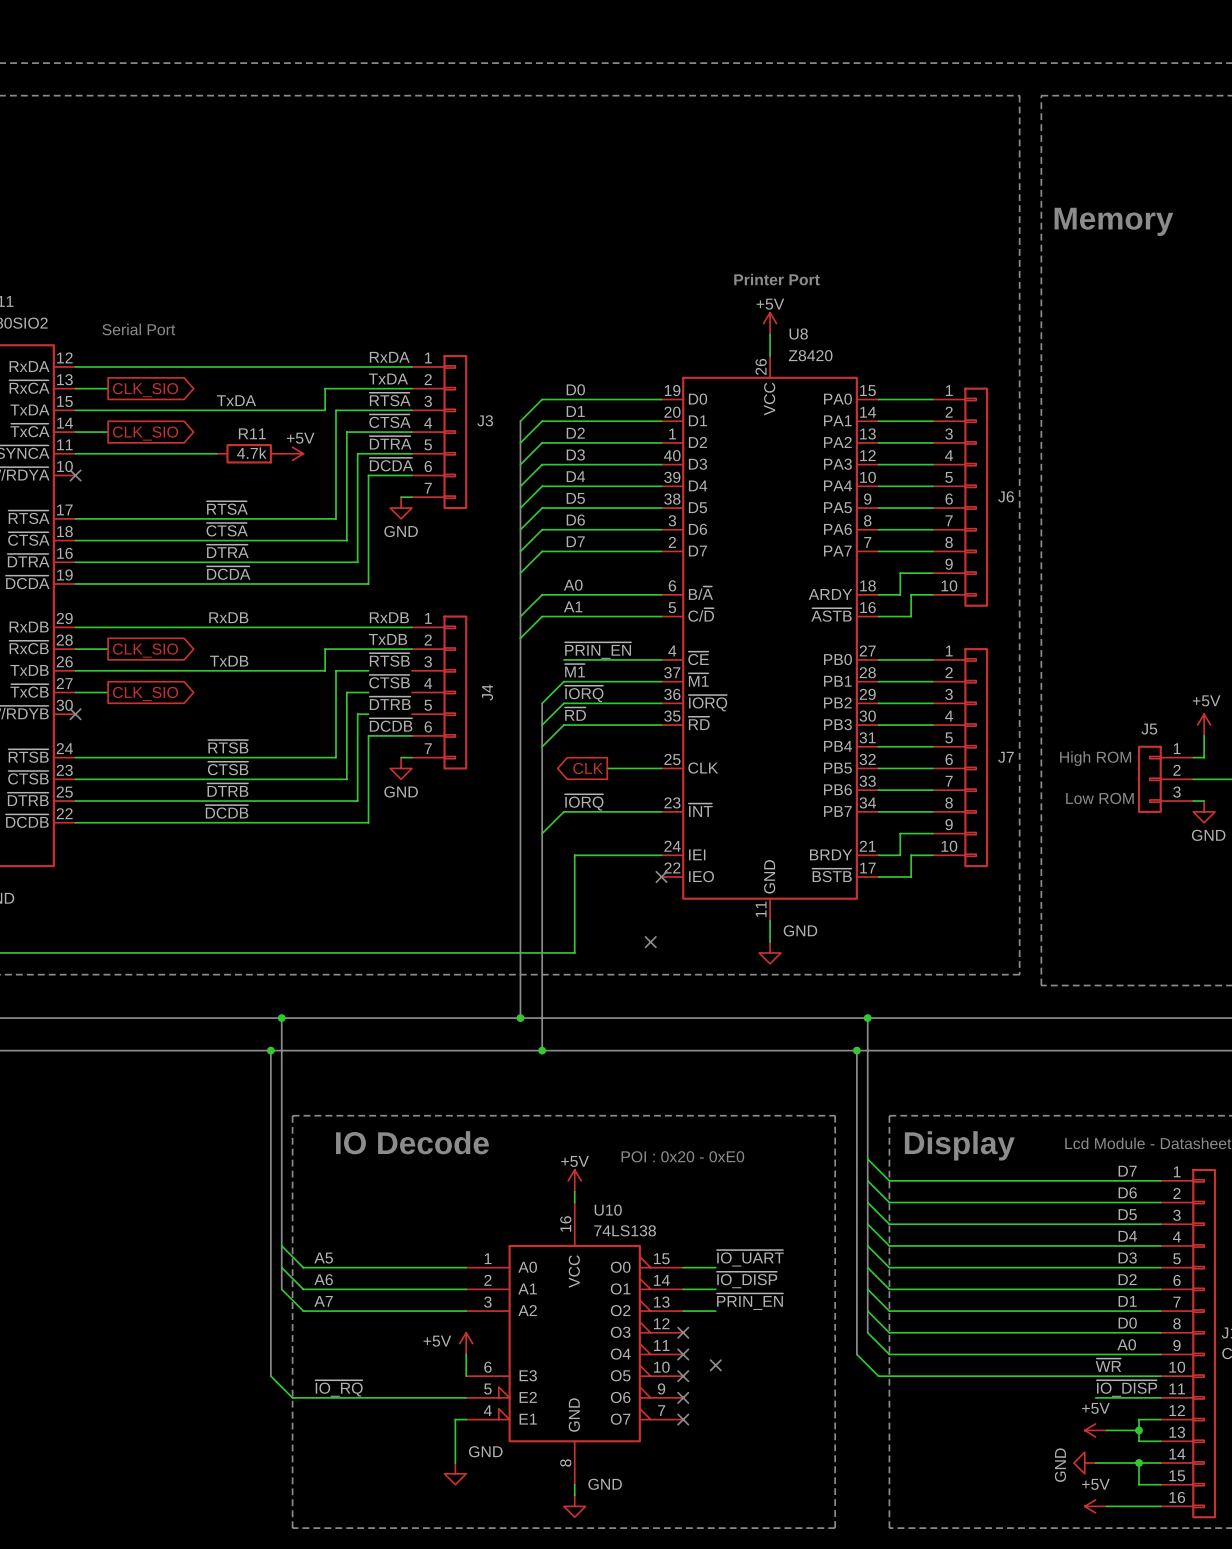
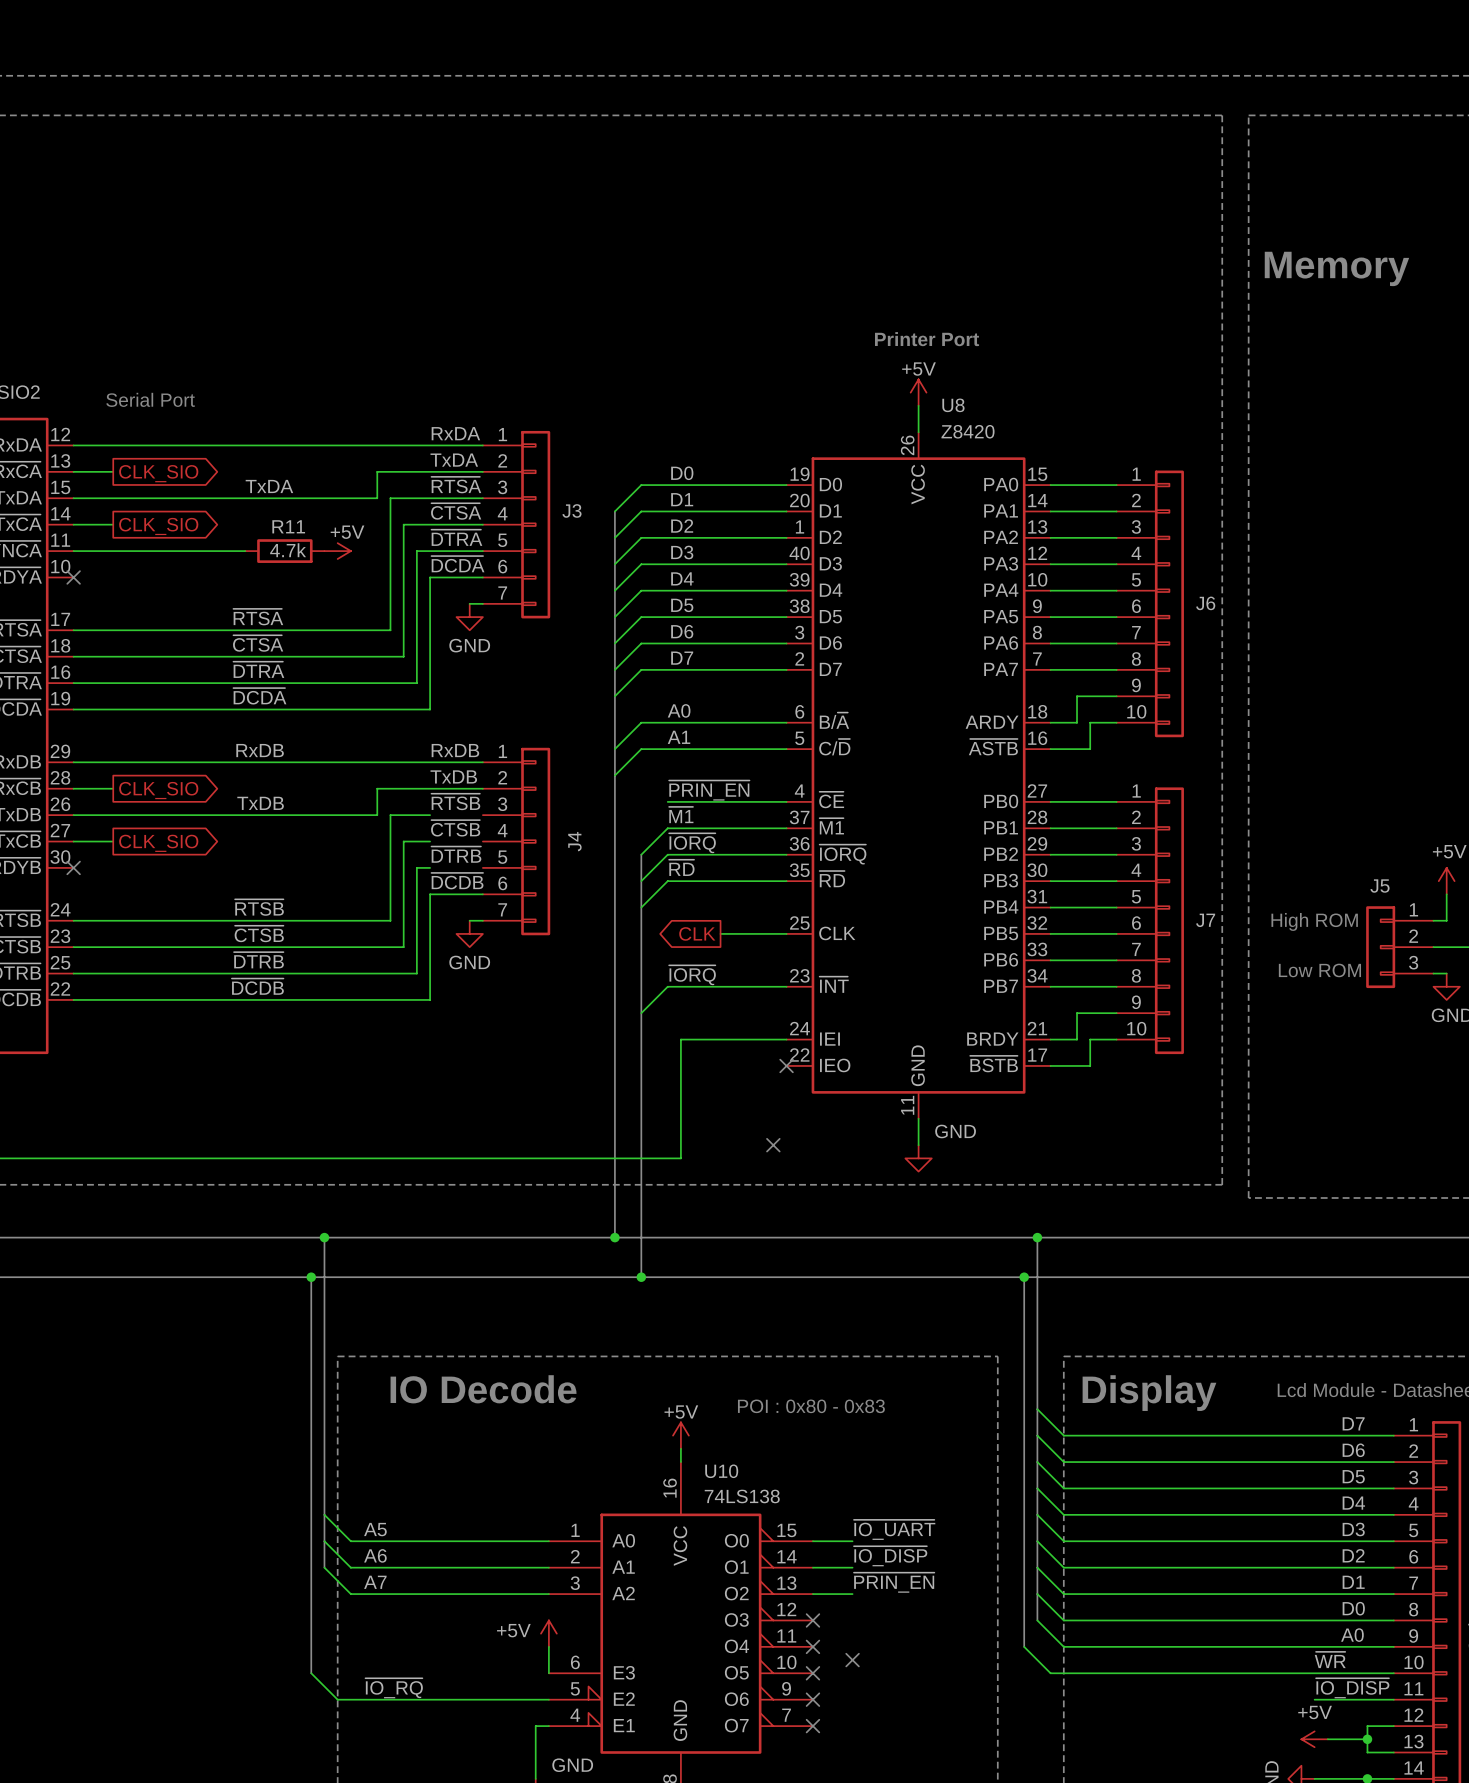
text: POI : 0x20 - 0xE0 (682, 1156) -> POI : 0x80 - 0x83 (811, 1406)

